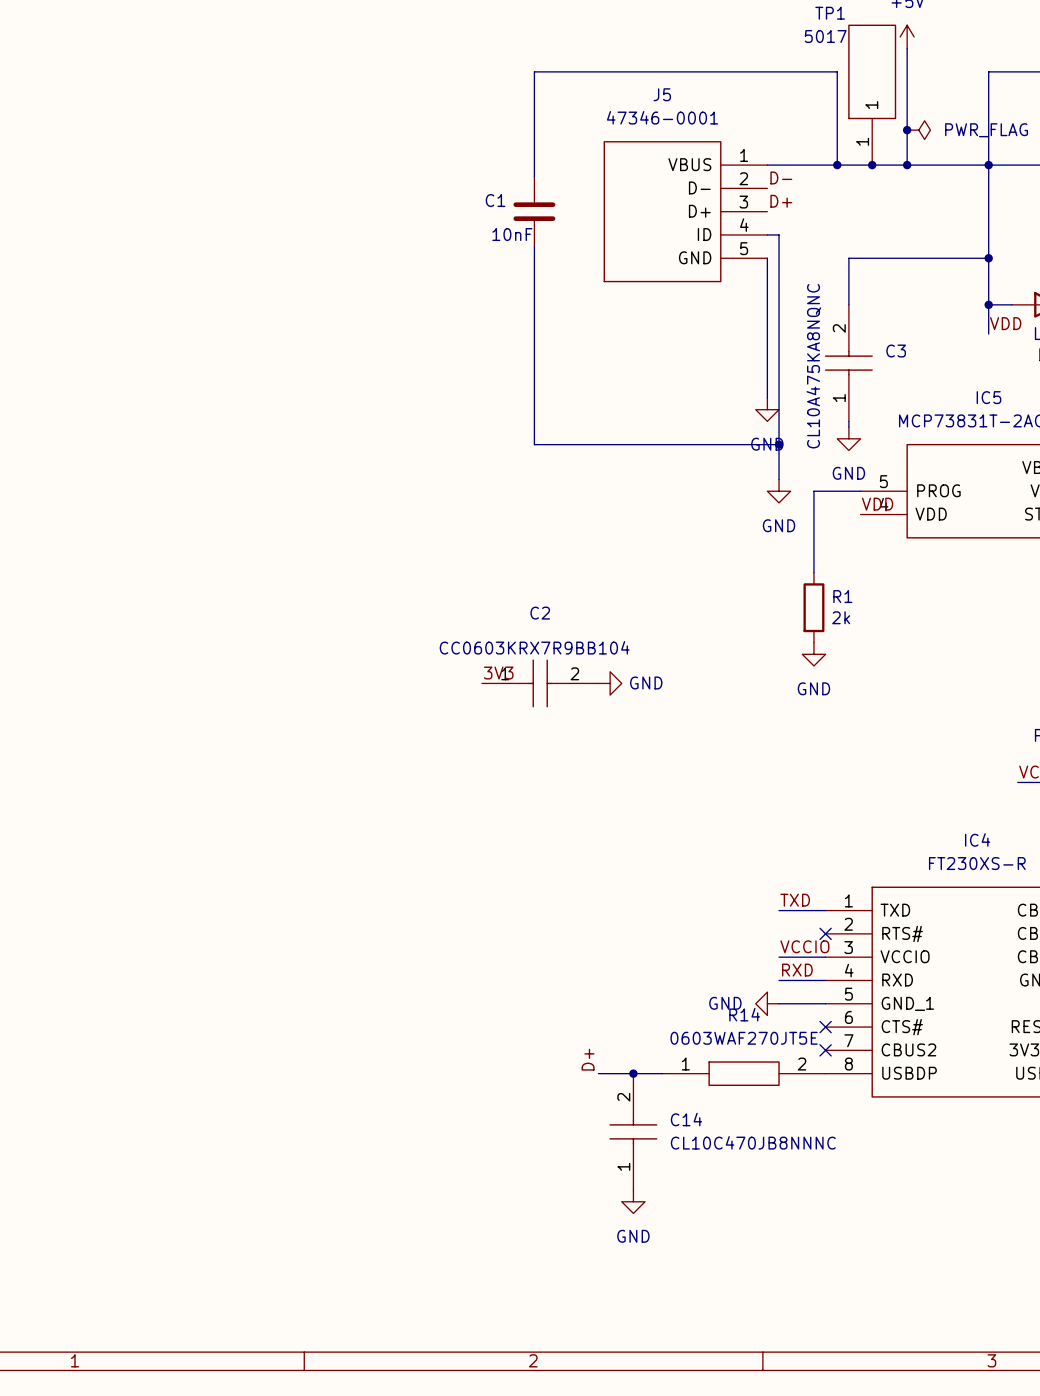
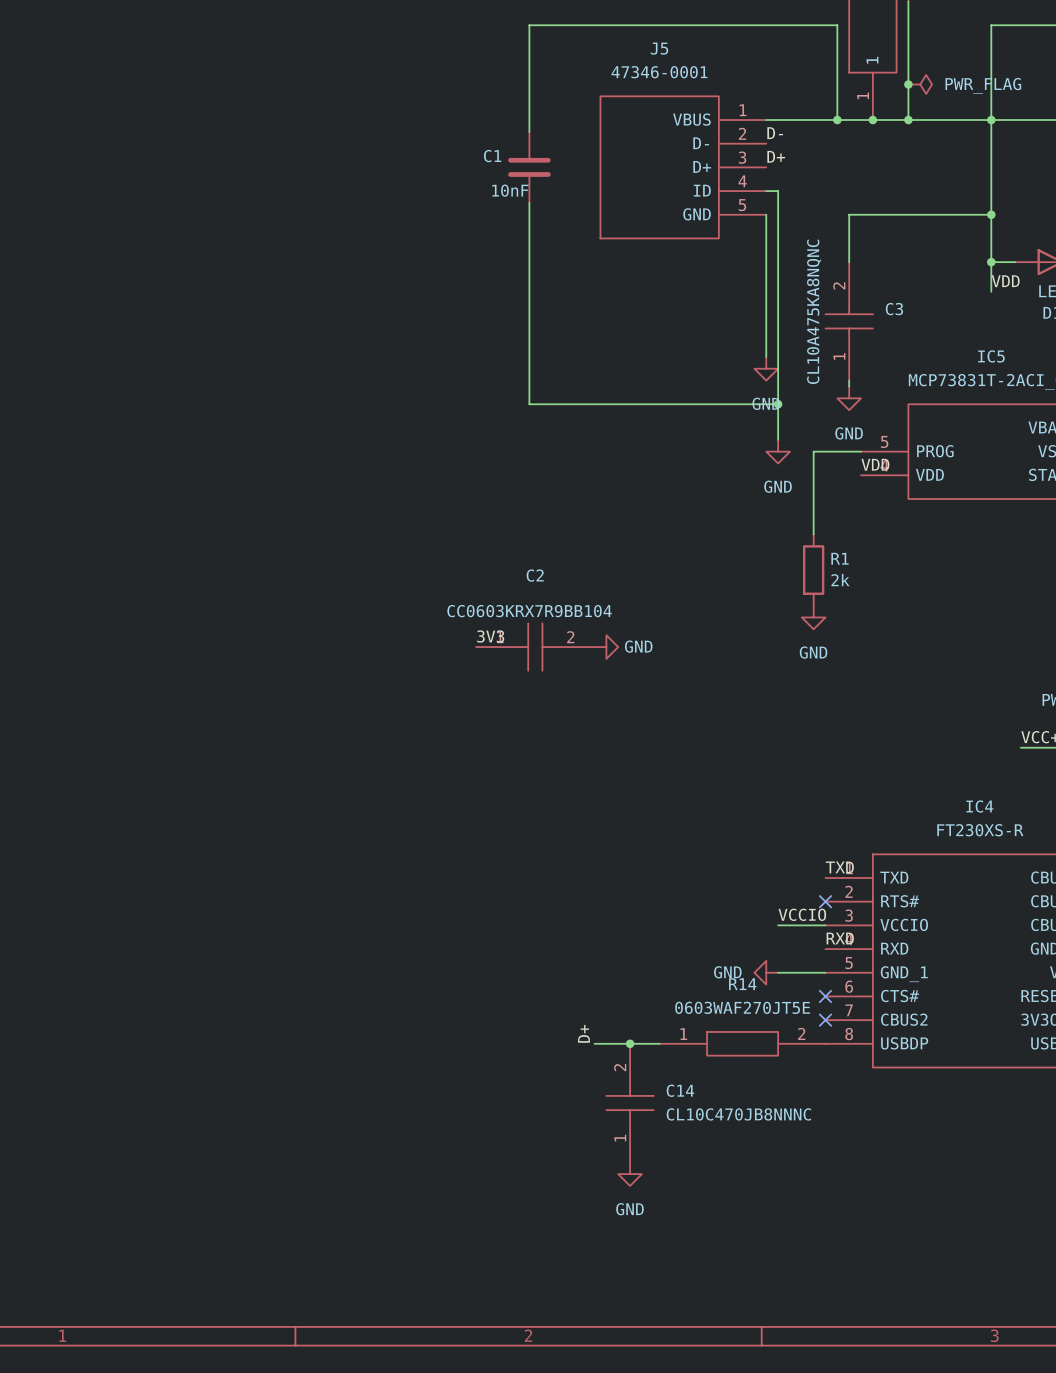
label position: TXD (795, 900) -> TXD (839, 867)
wire: (779, 910) (825, 910) -> none
label position: RXD (797, 970) -> RXD (840, 938)
wire: (779, 980) (825, 980) -> none

